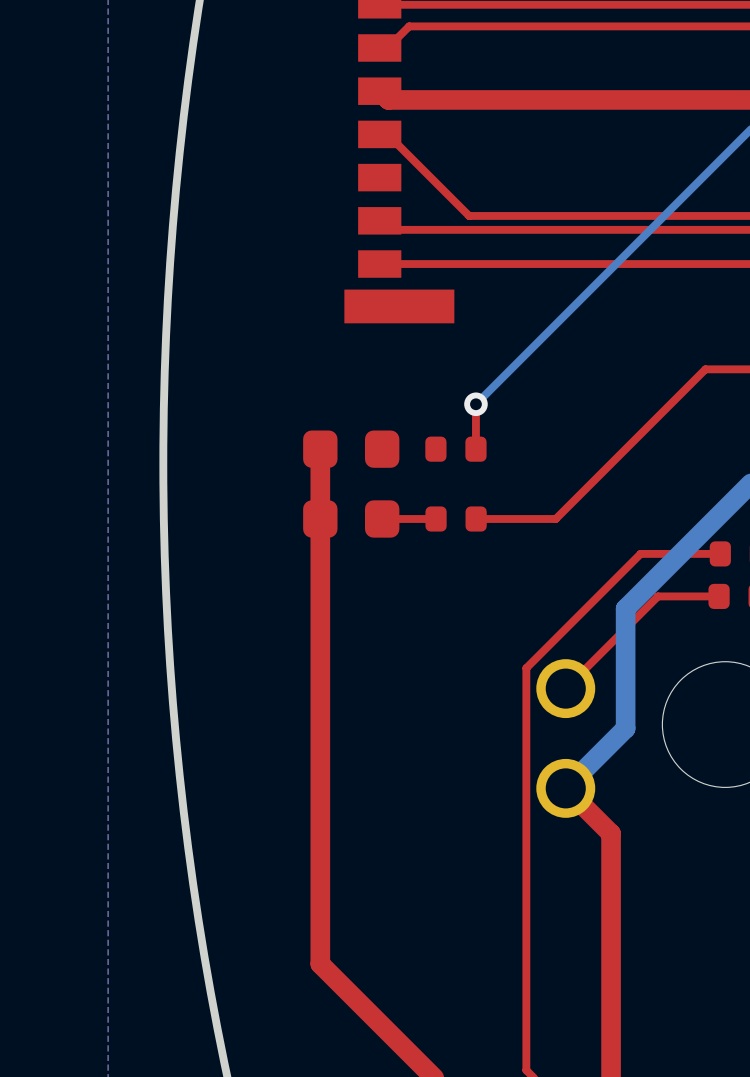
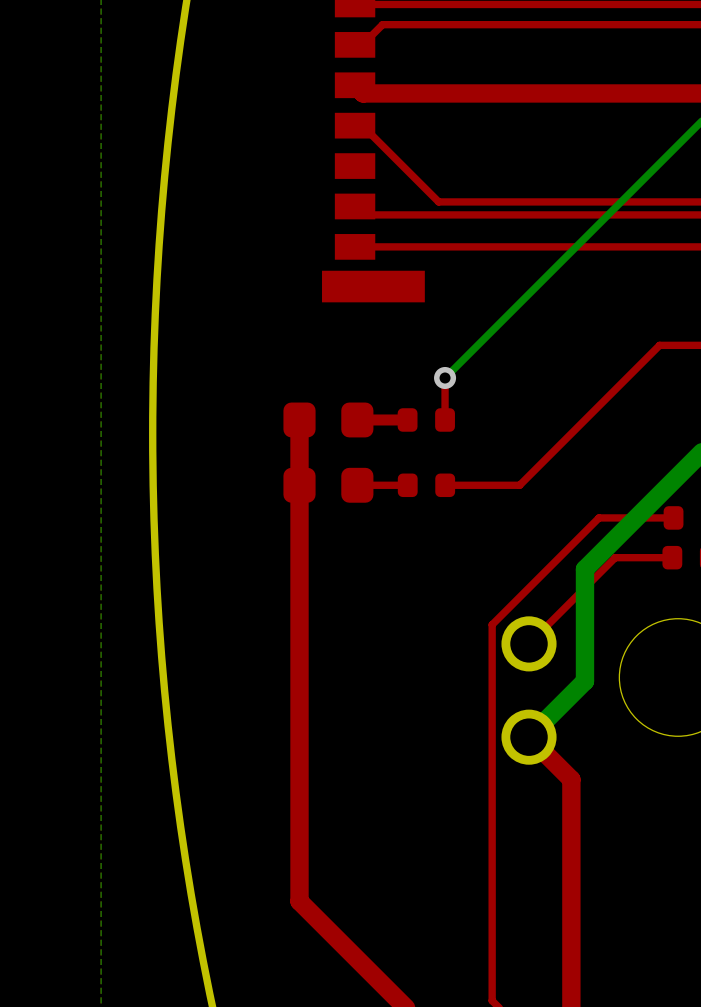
top track: none -> (407, 419) (357, 419)

